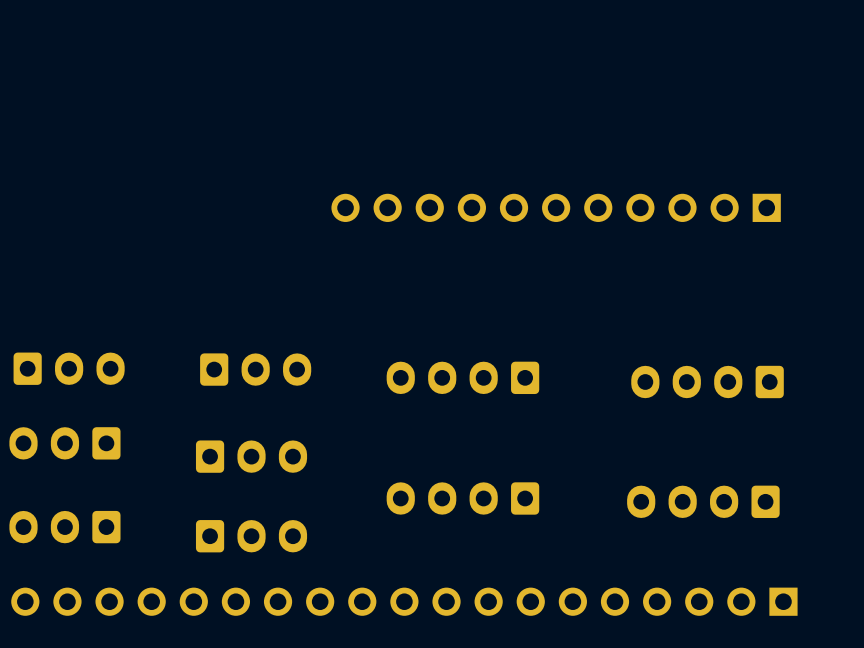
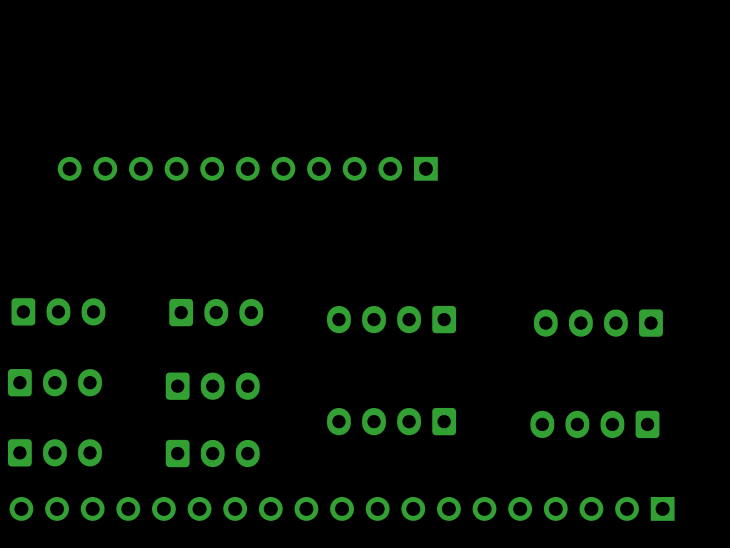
part position: (556, 207) -> (247, 168)
part rotation: 0° (64, 443) -> 180° (54, 382)
part rotation: 0° (64, 527) -> 180° (54, 452)

